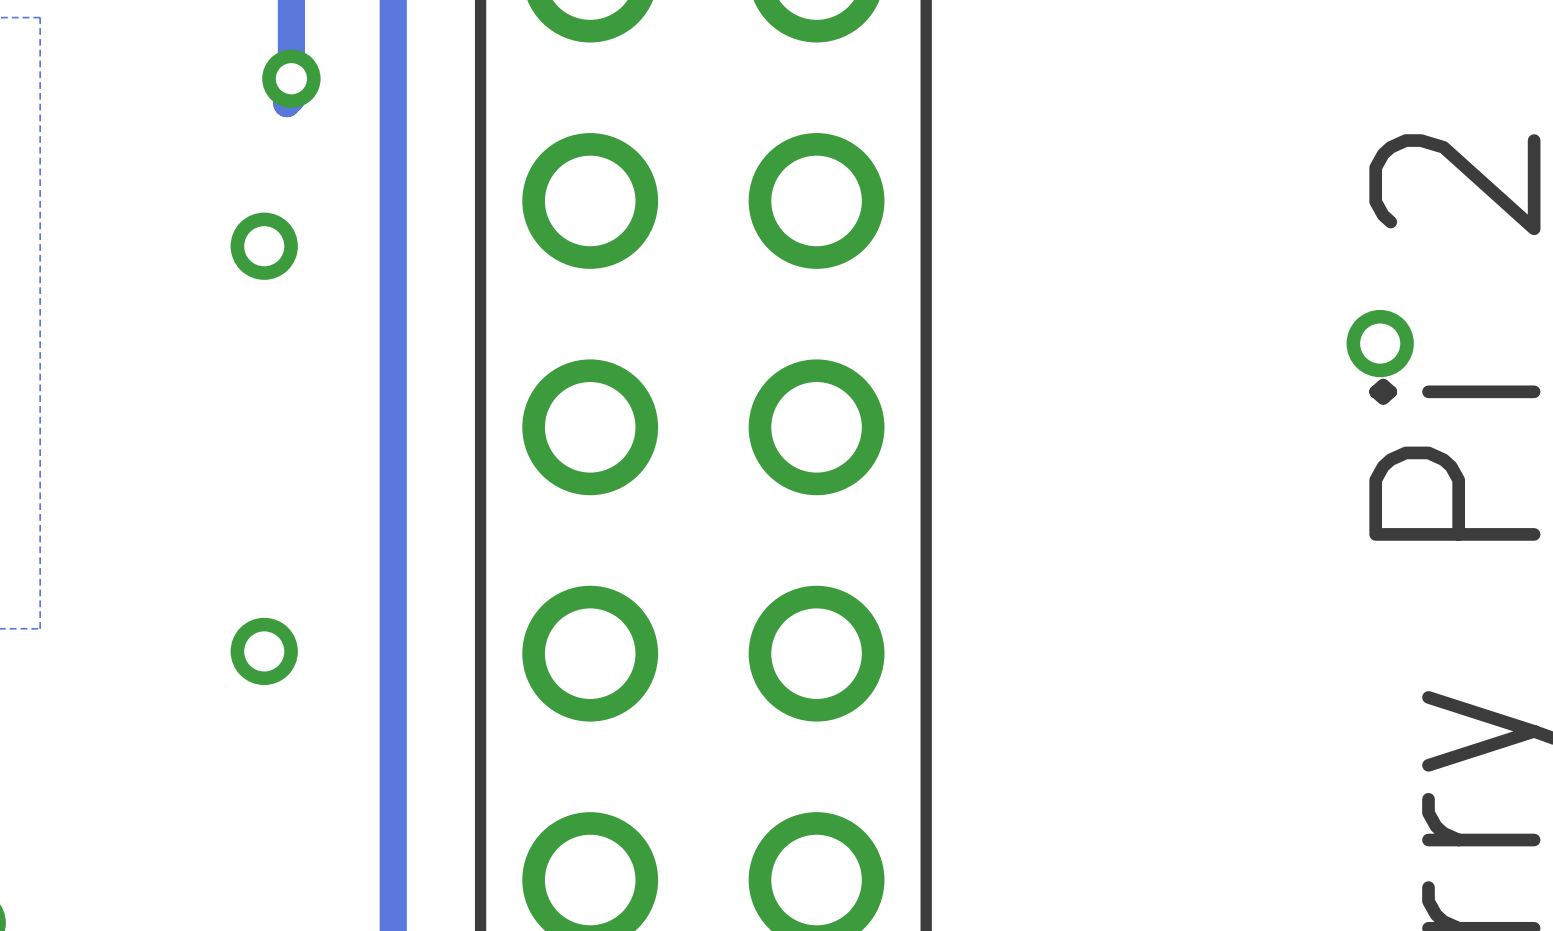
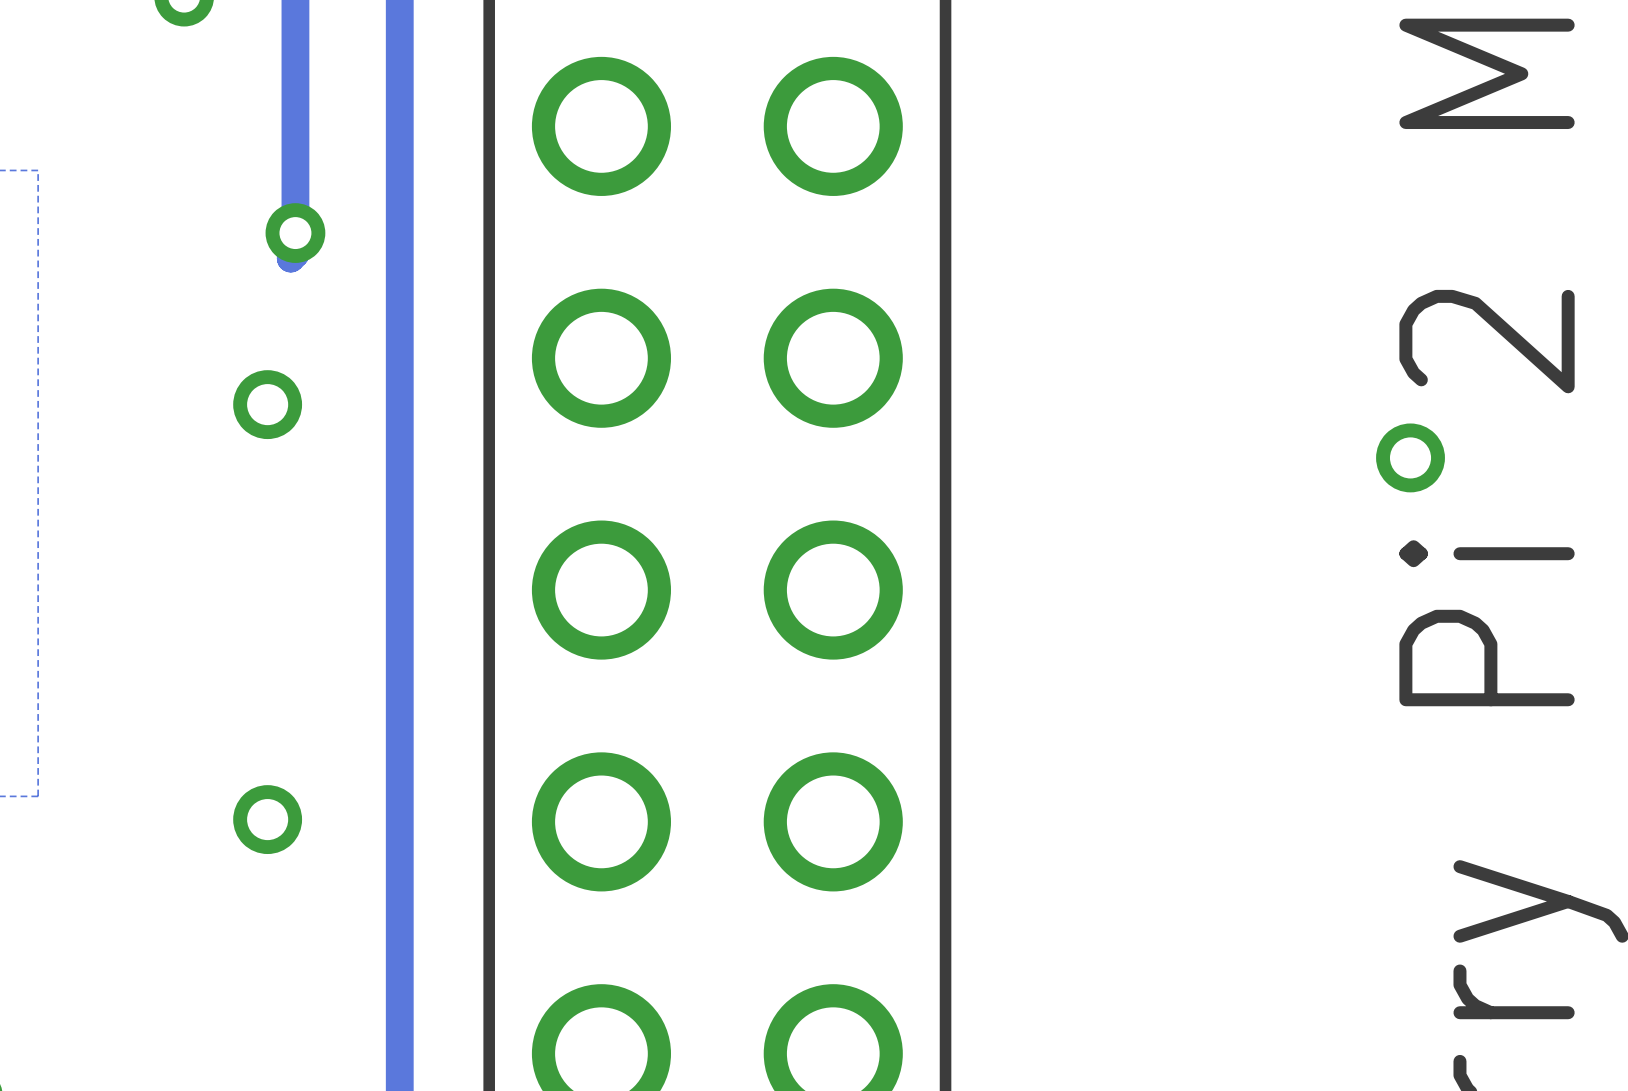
via position: (1380, 343) -> (1410, 457)

